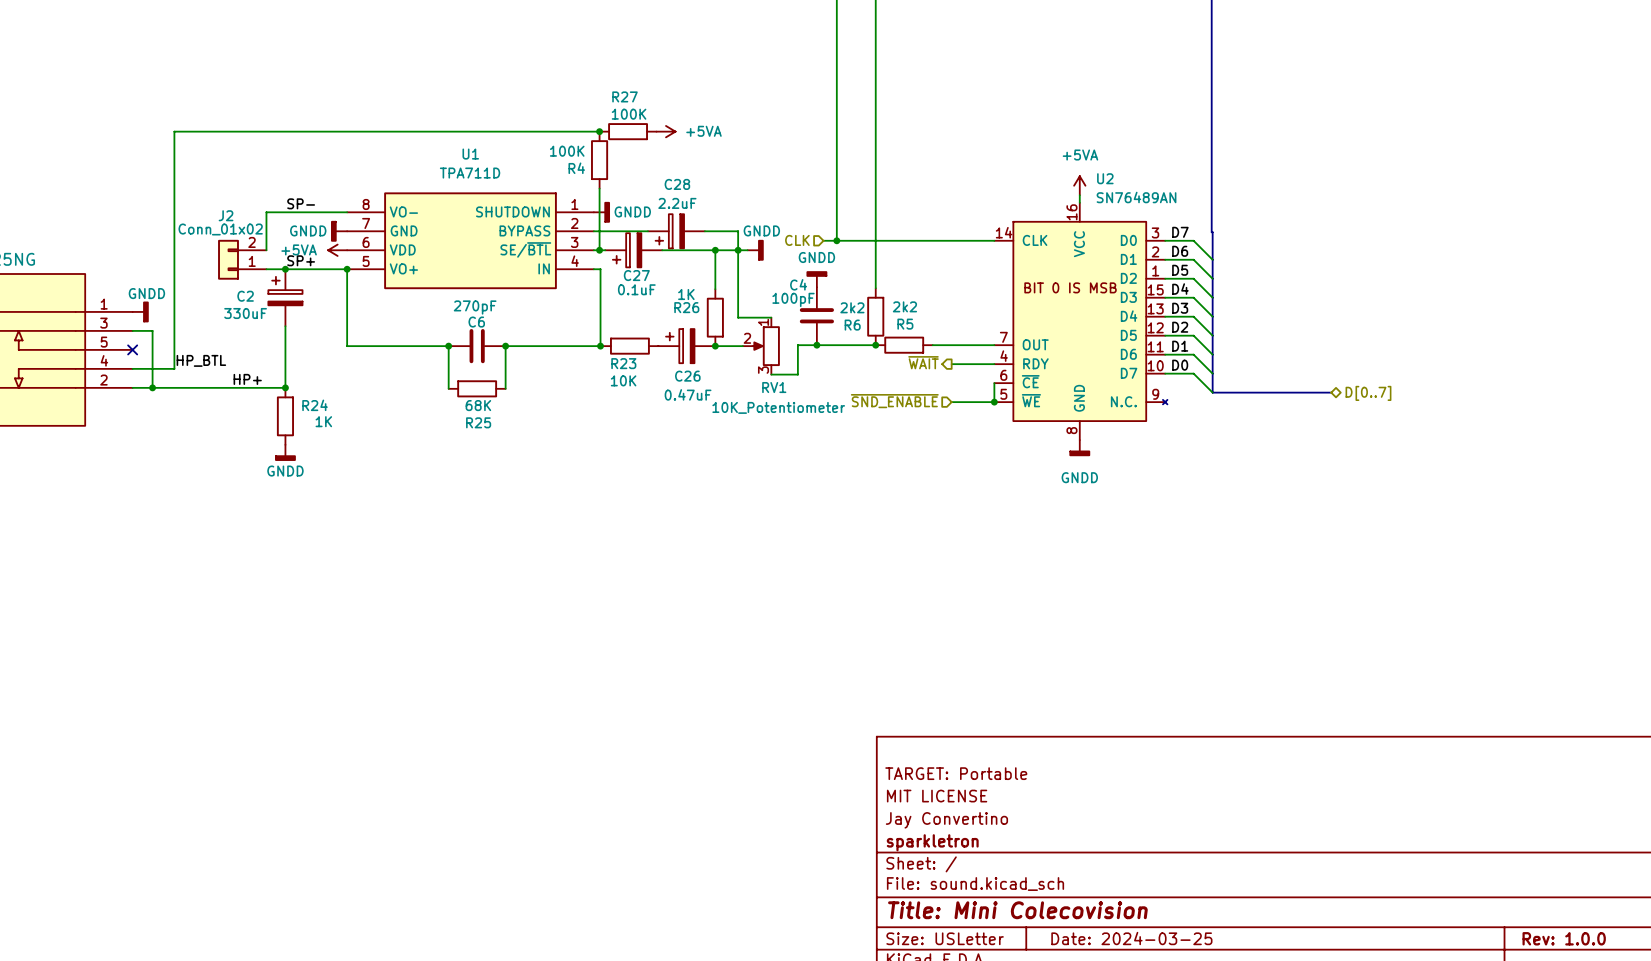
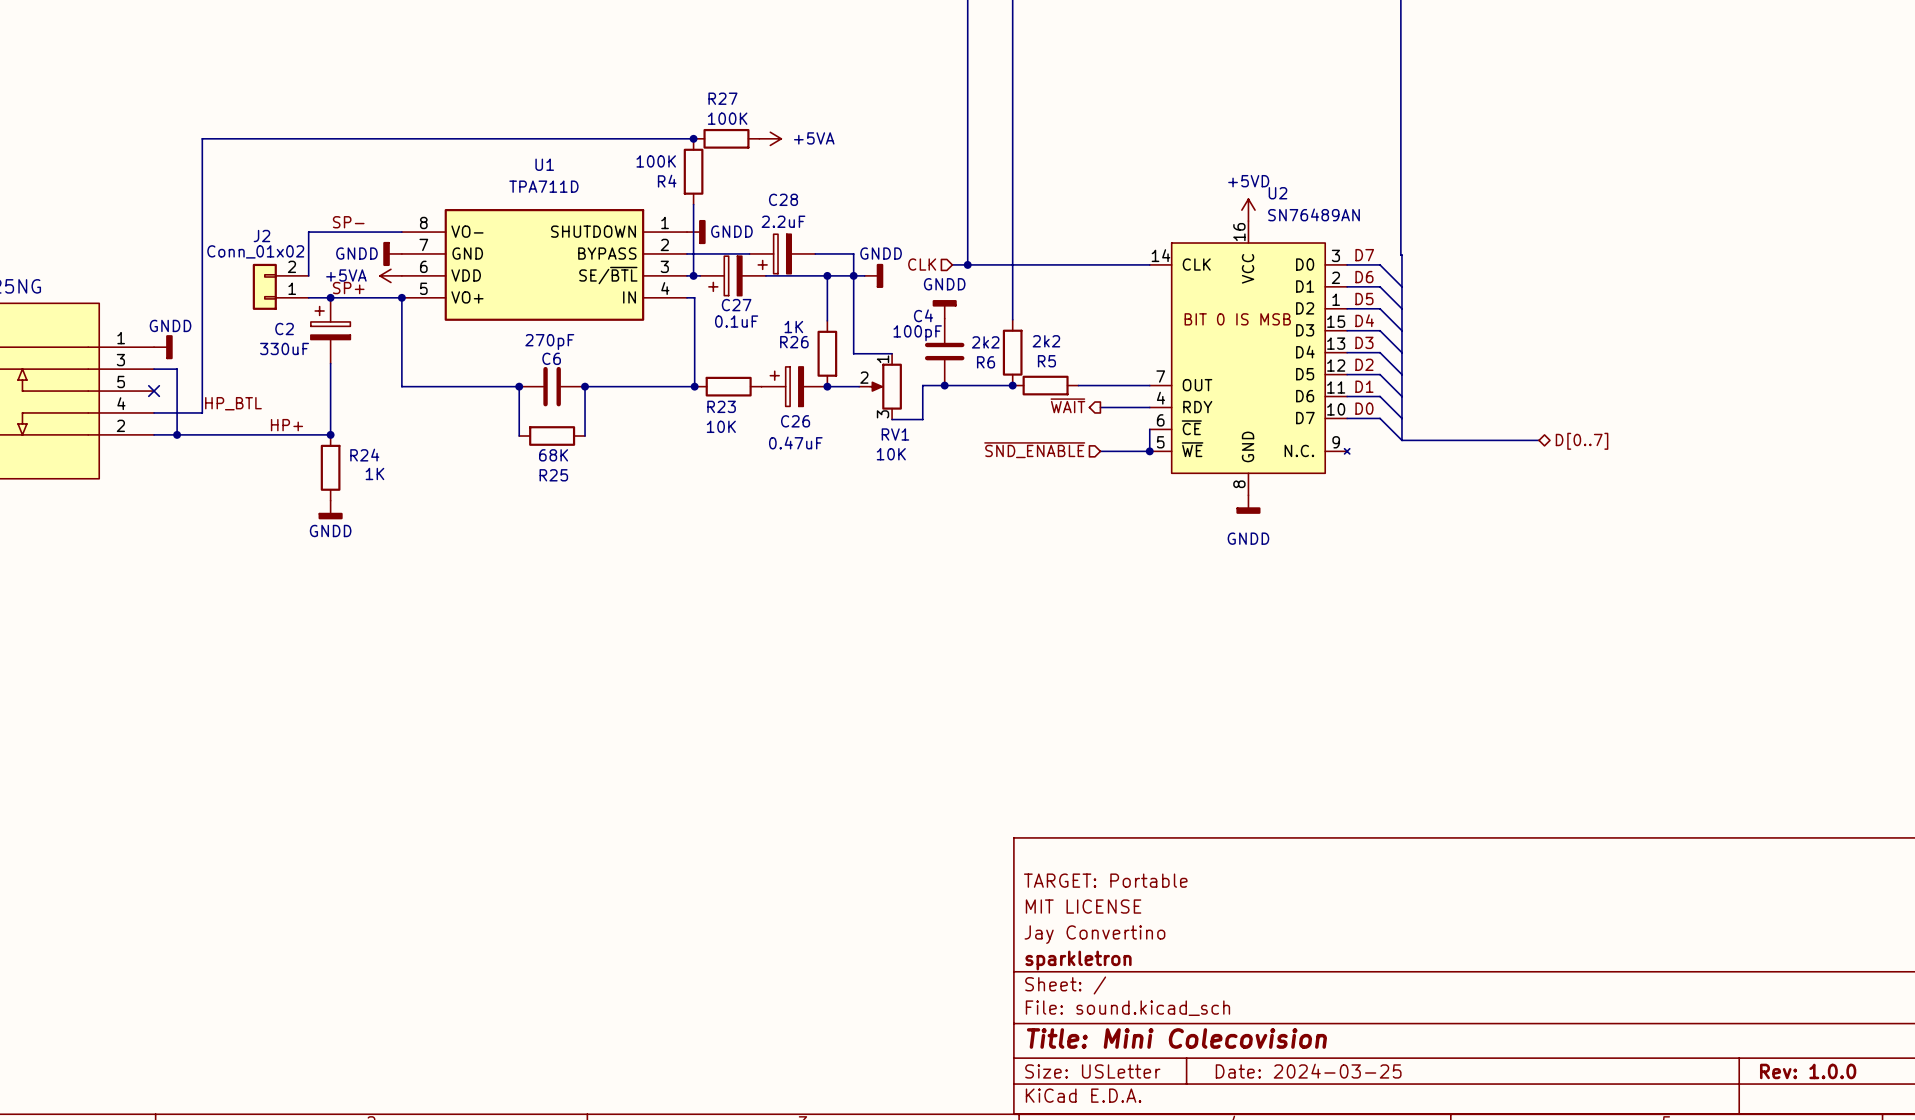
power symbol: +5VA (1079, 185) -> none
power symbol: none -> +5VD (1248, 210)
RV1 value: 10K_Potentiometer (778, 407) -> 10K (891, 454)

